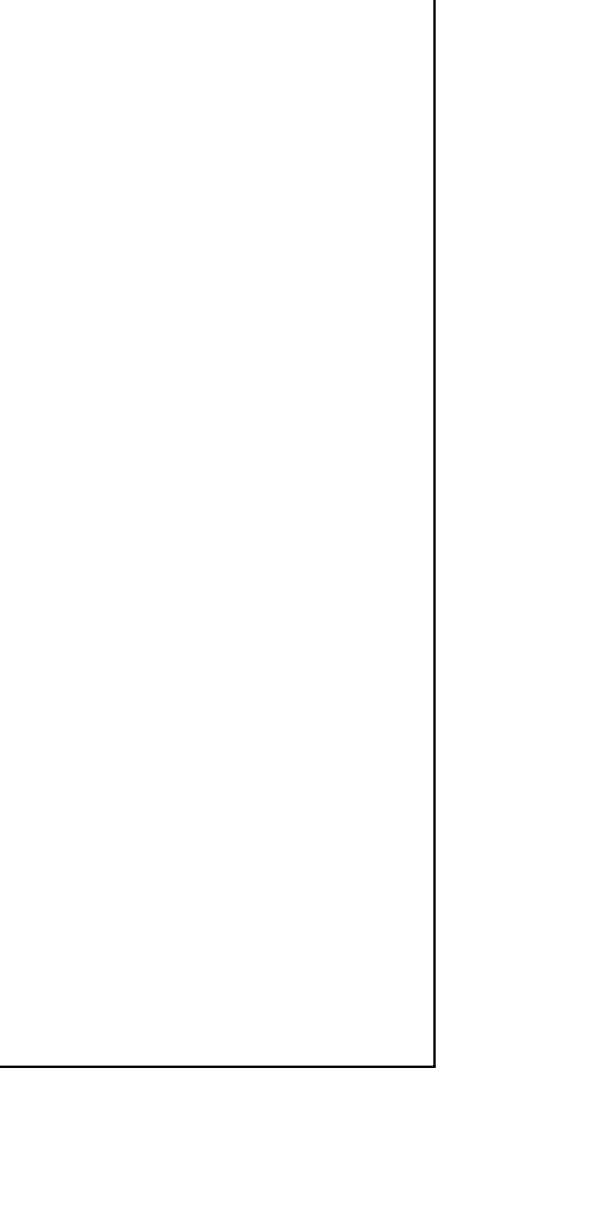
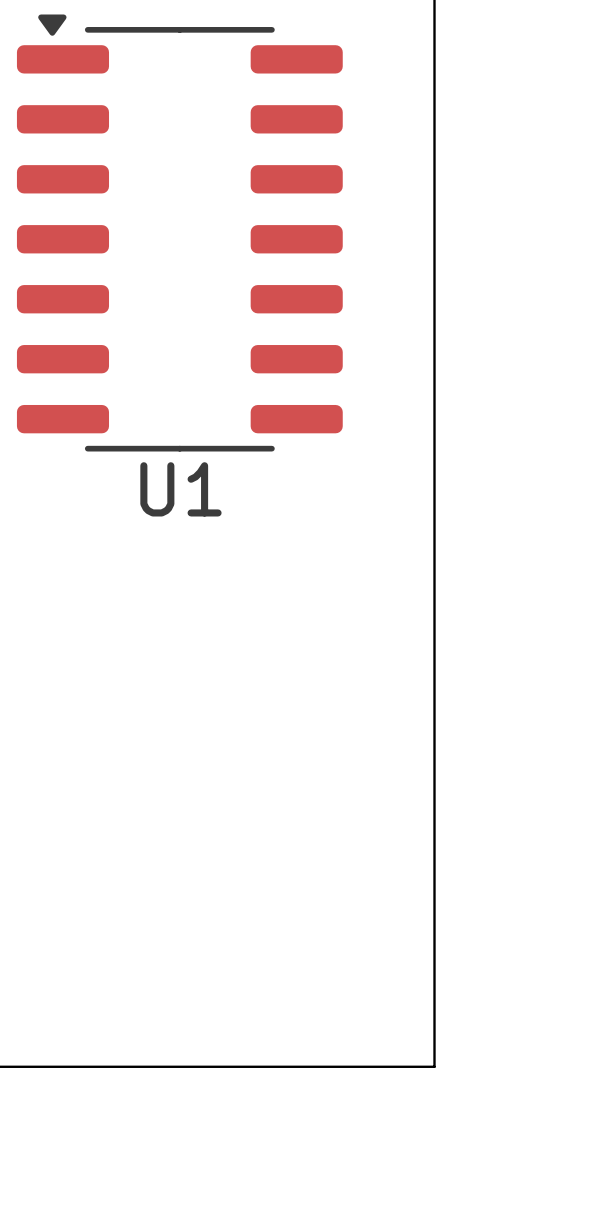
U1: none -> (179, 232)

